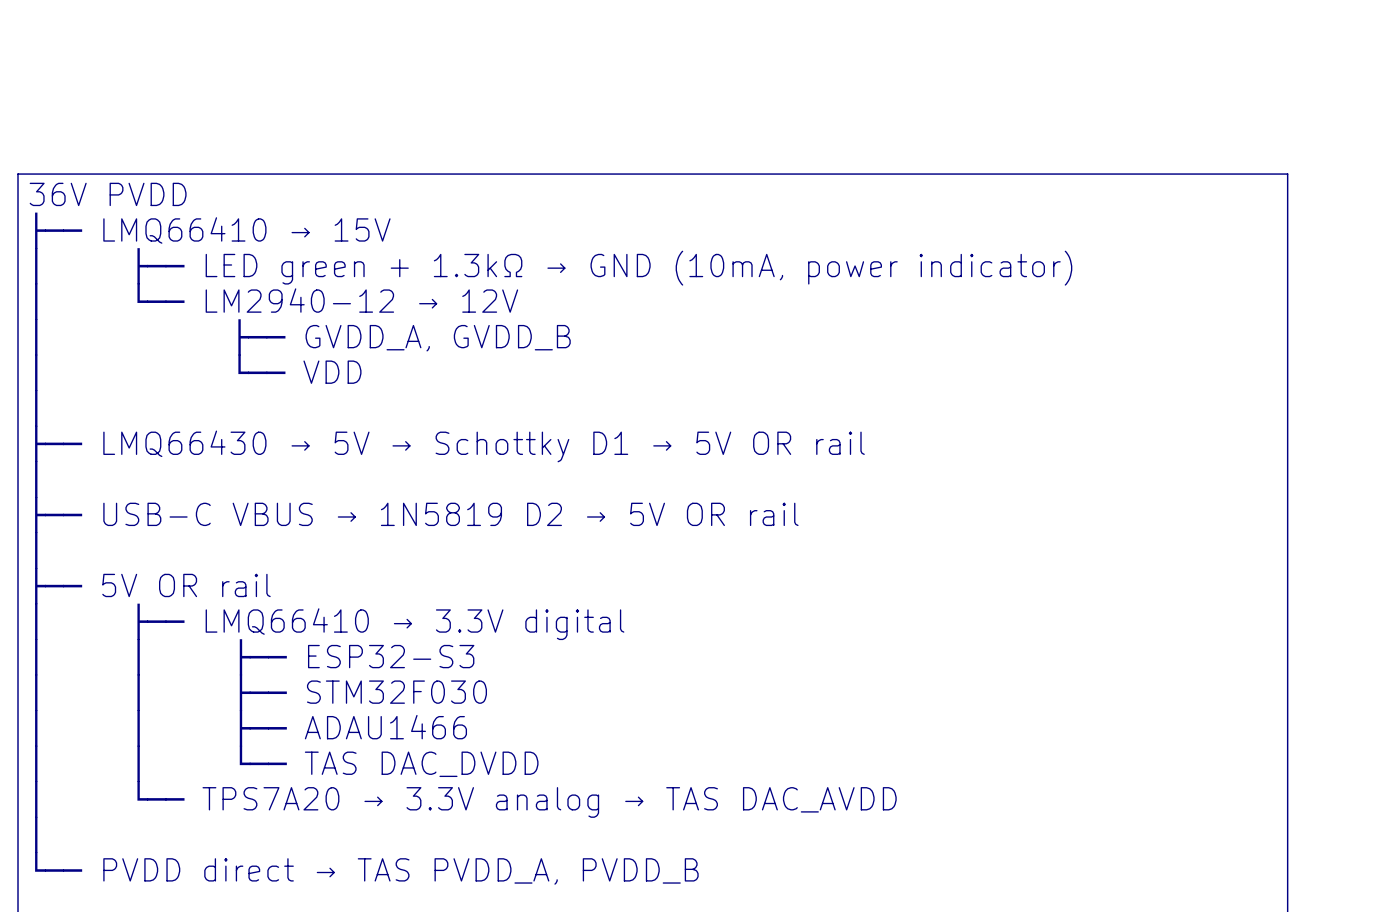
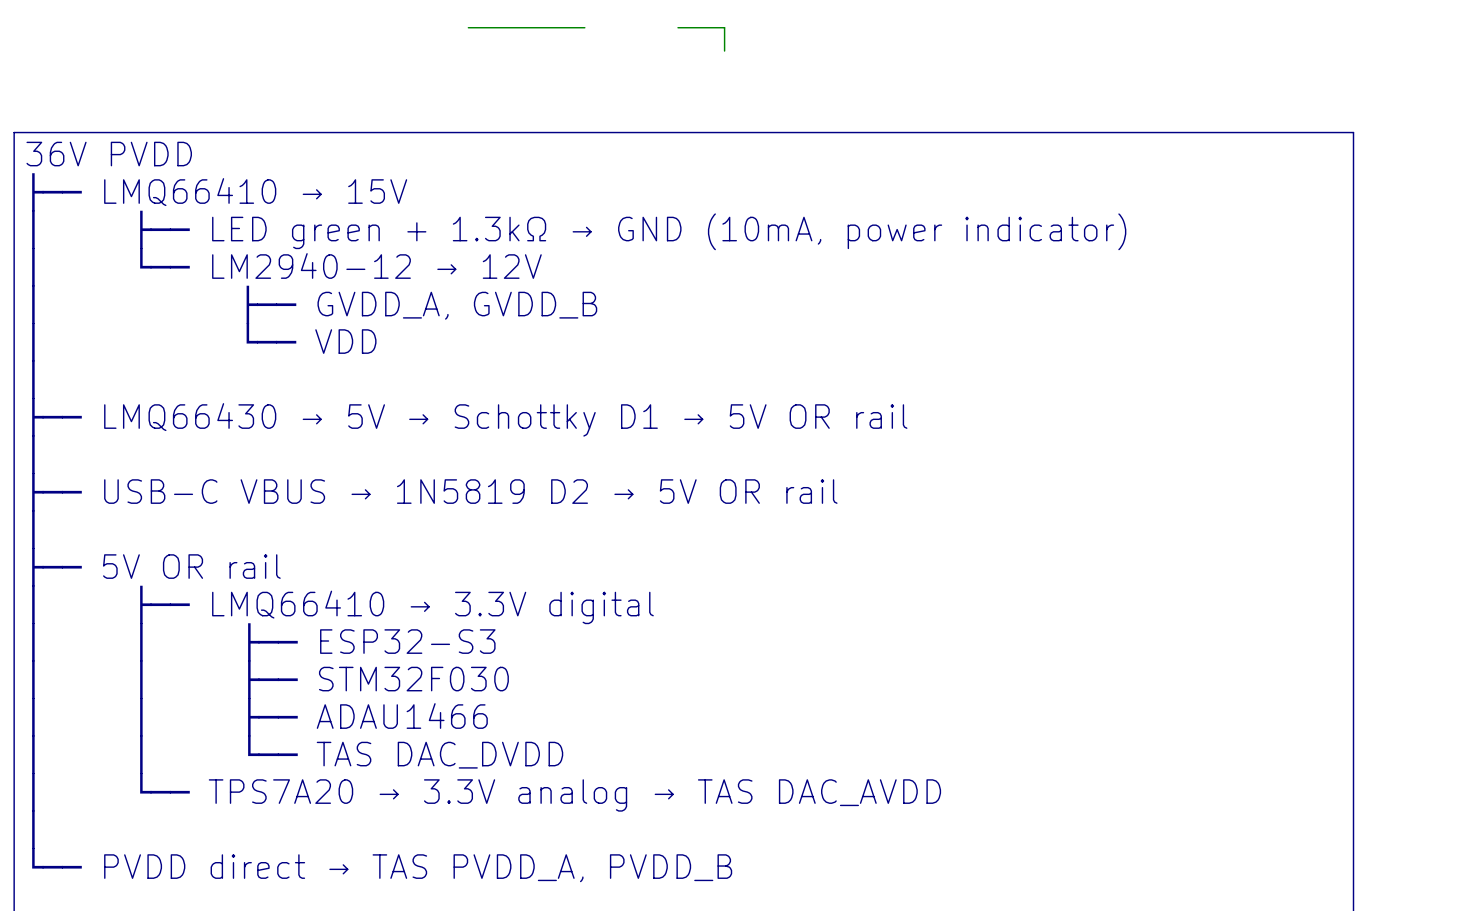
wire: none -> (468, 27) (584, 27)
wire: none -> (678, 27) (724, 27) (724, 51)

